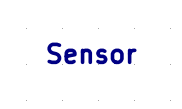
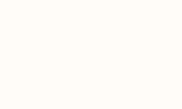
text: Sensor (91, 53) -> none

